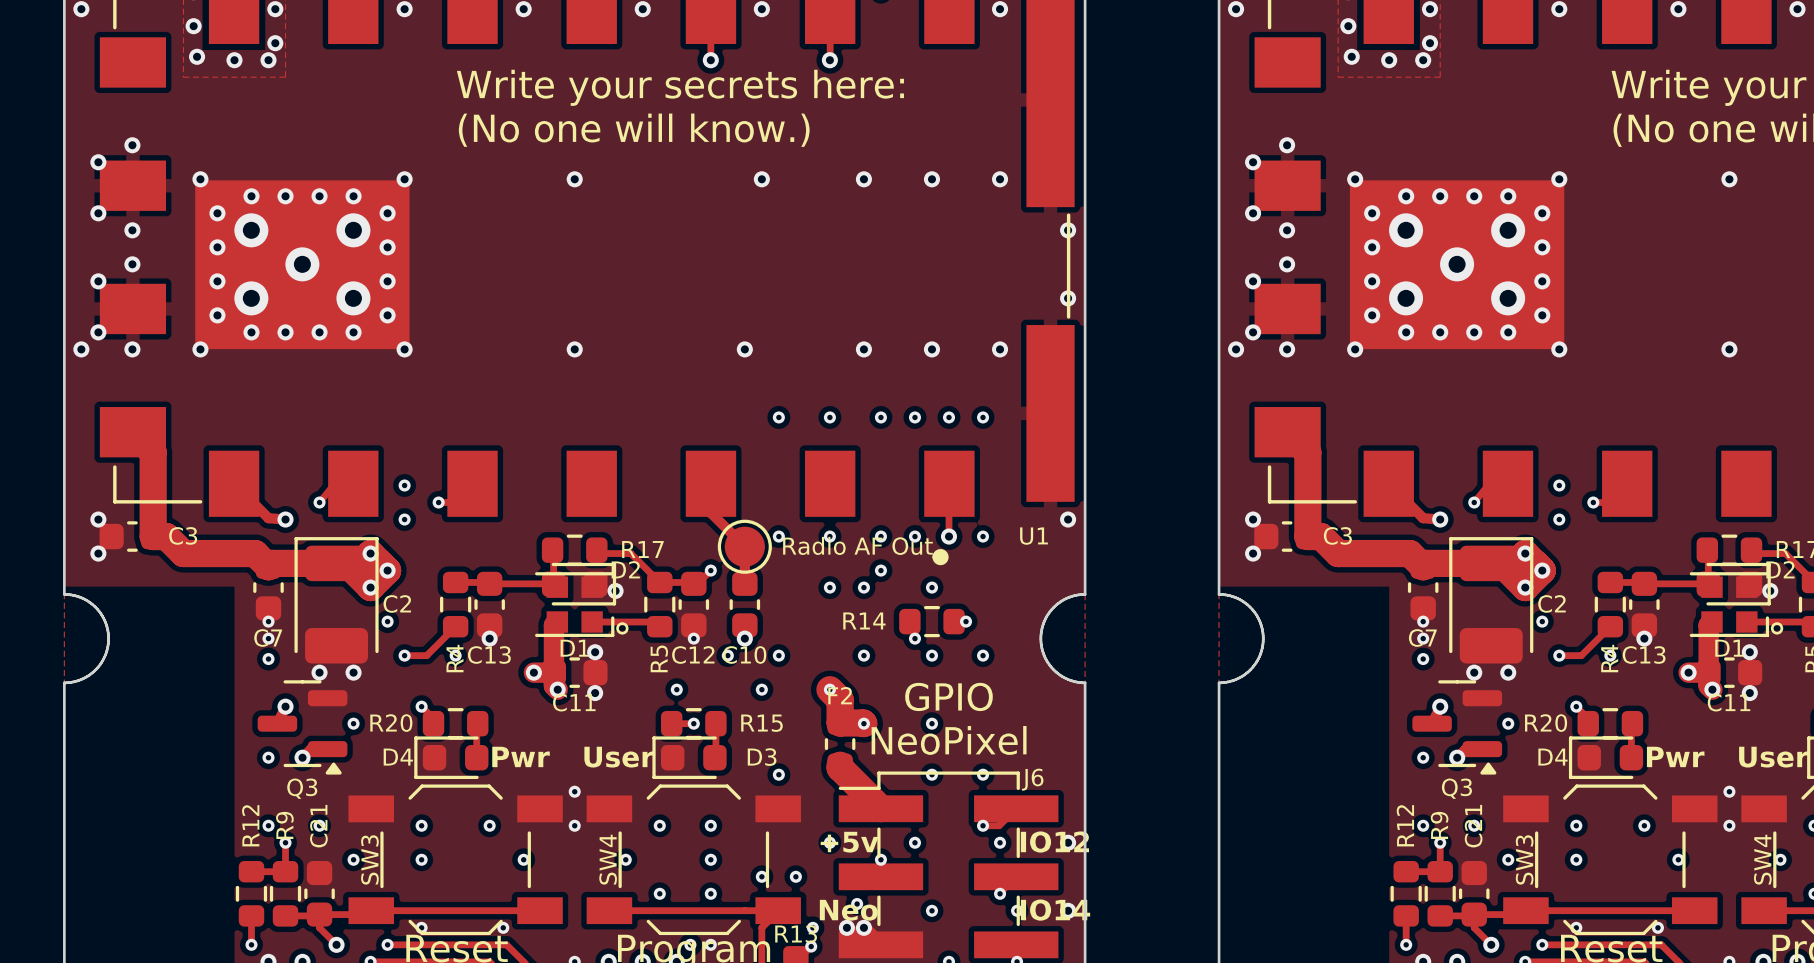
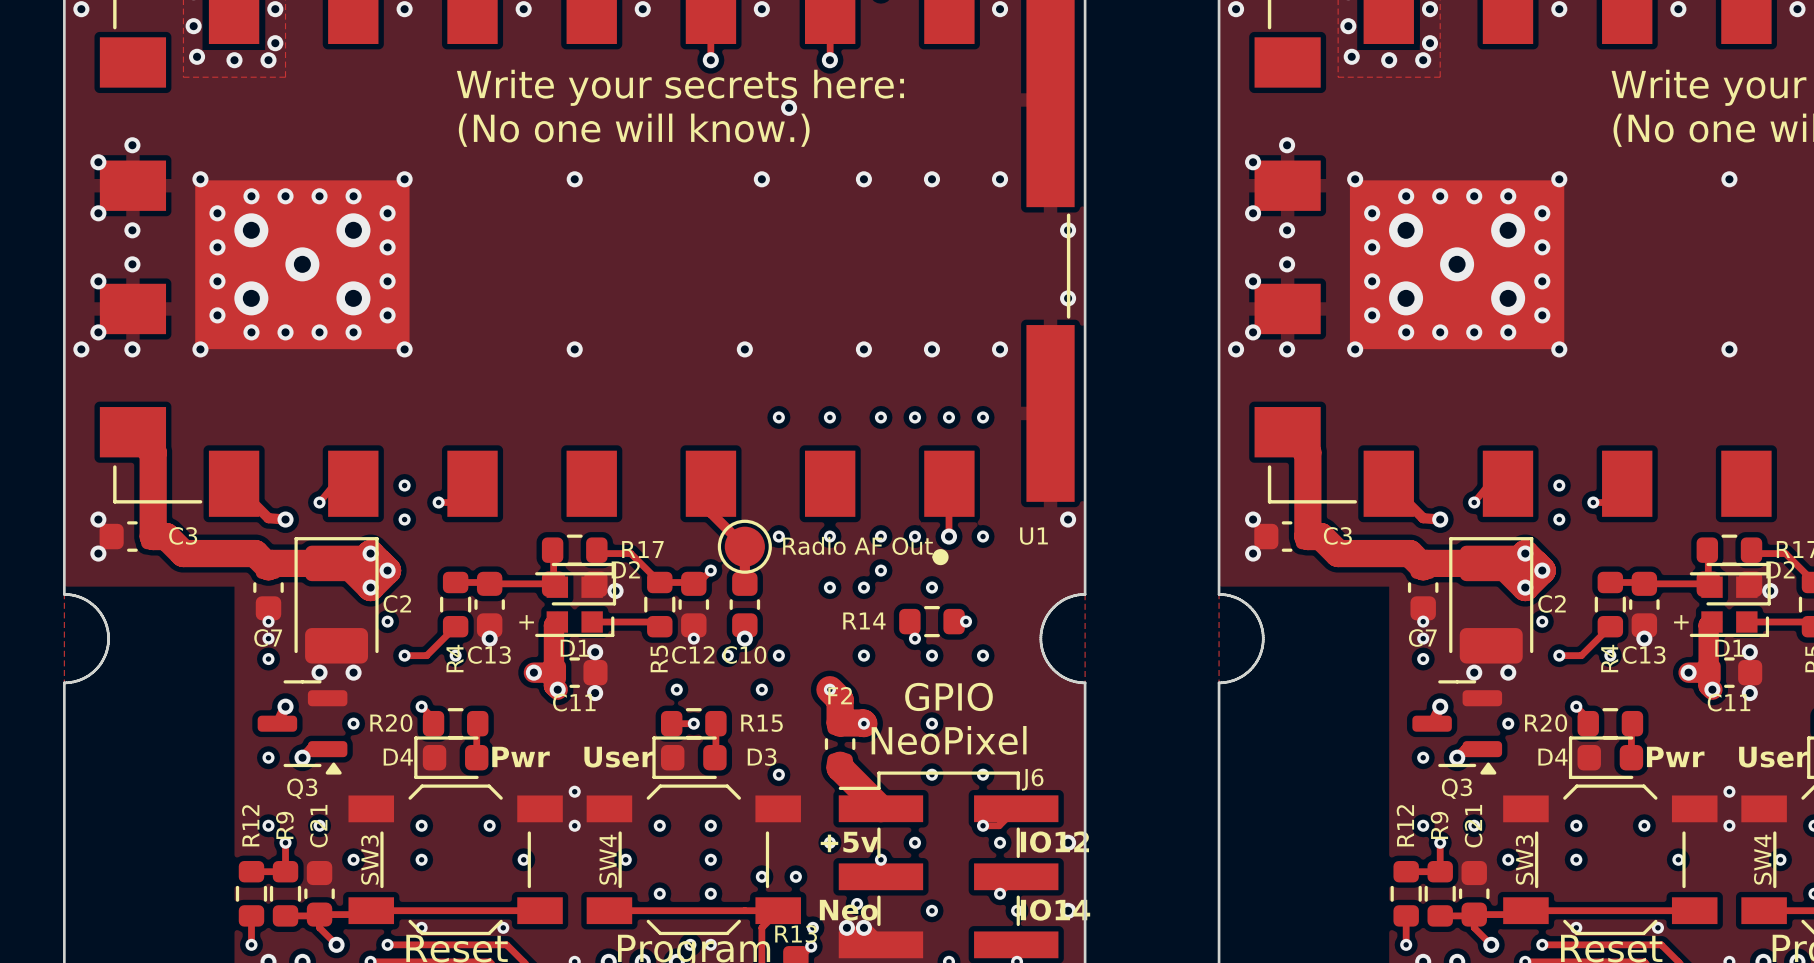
via: none -> (789, 107)
text: none -> + (526, 622)
drawing: [616, 622, 629, 635] -> none
text: none -> + (1681, 622)
drawing: [1770, 622, 1784, 635] -> none

